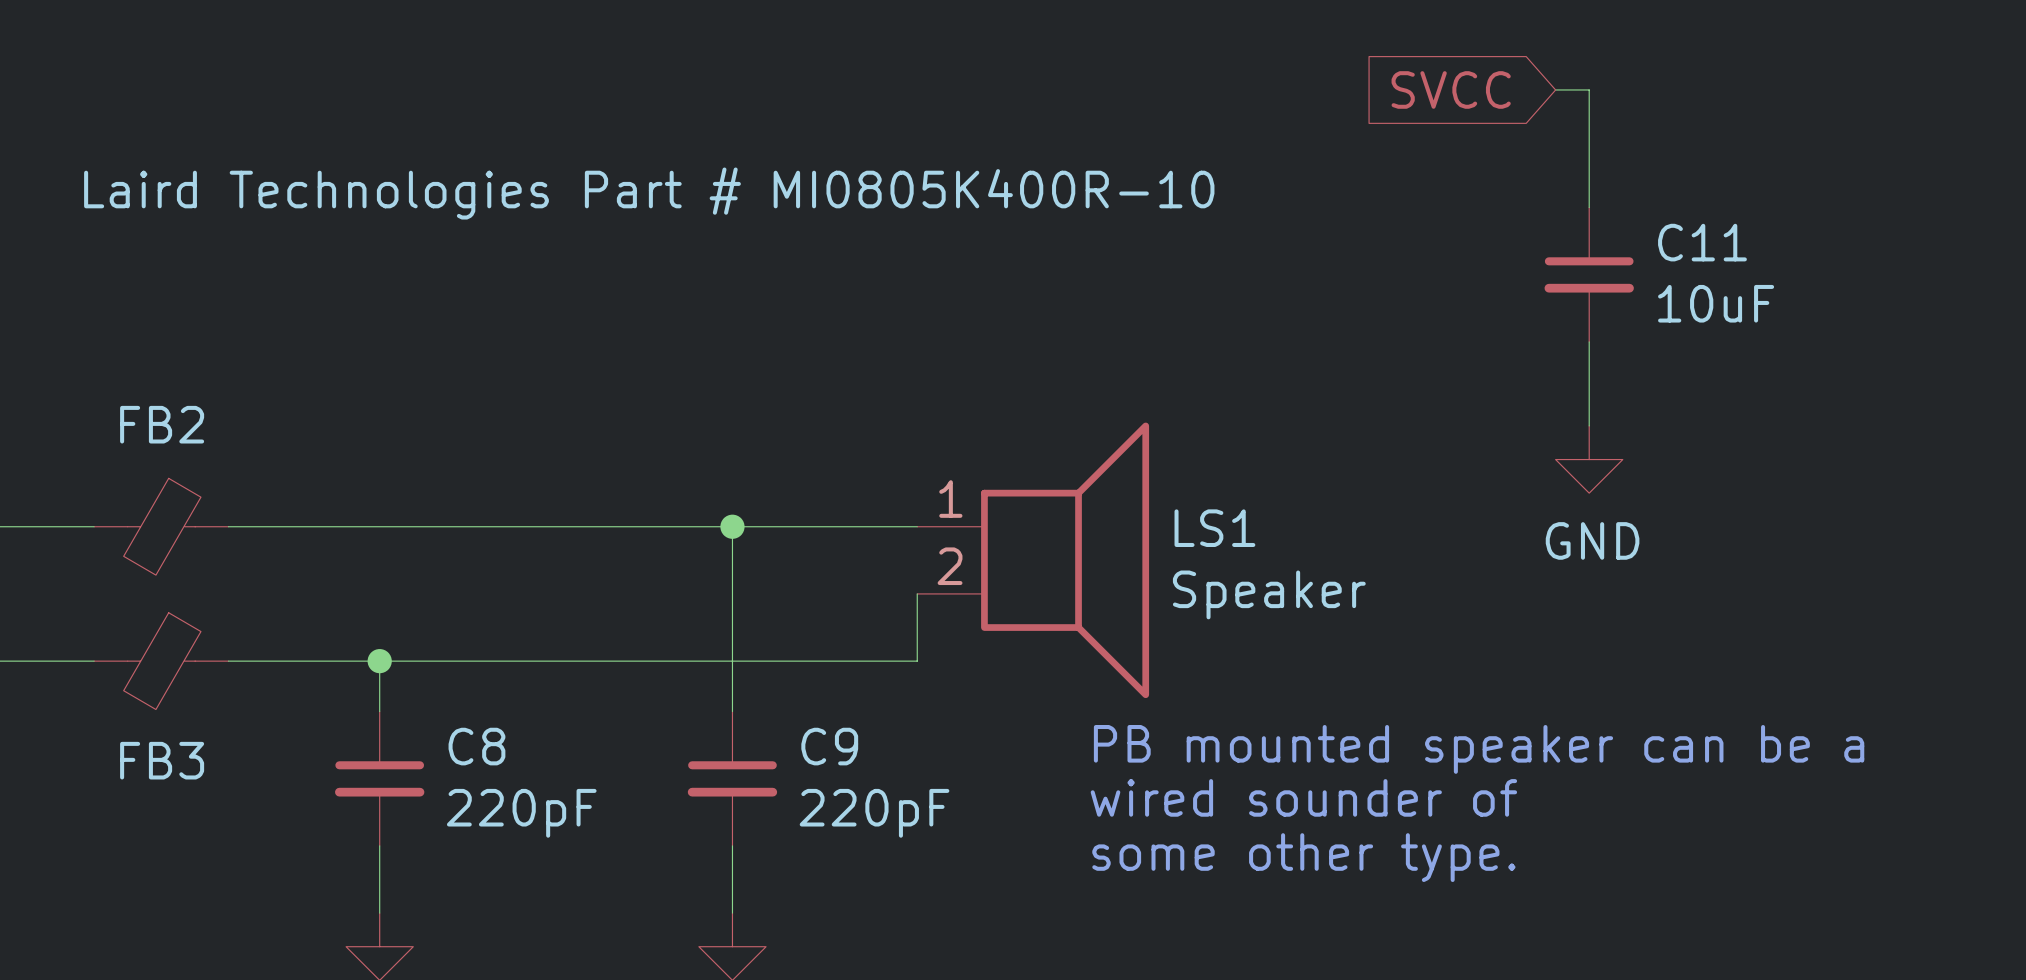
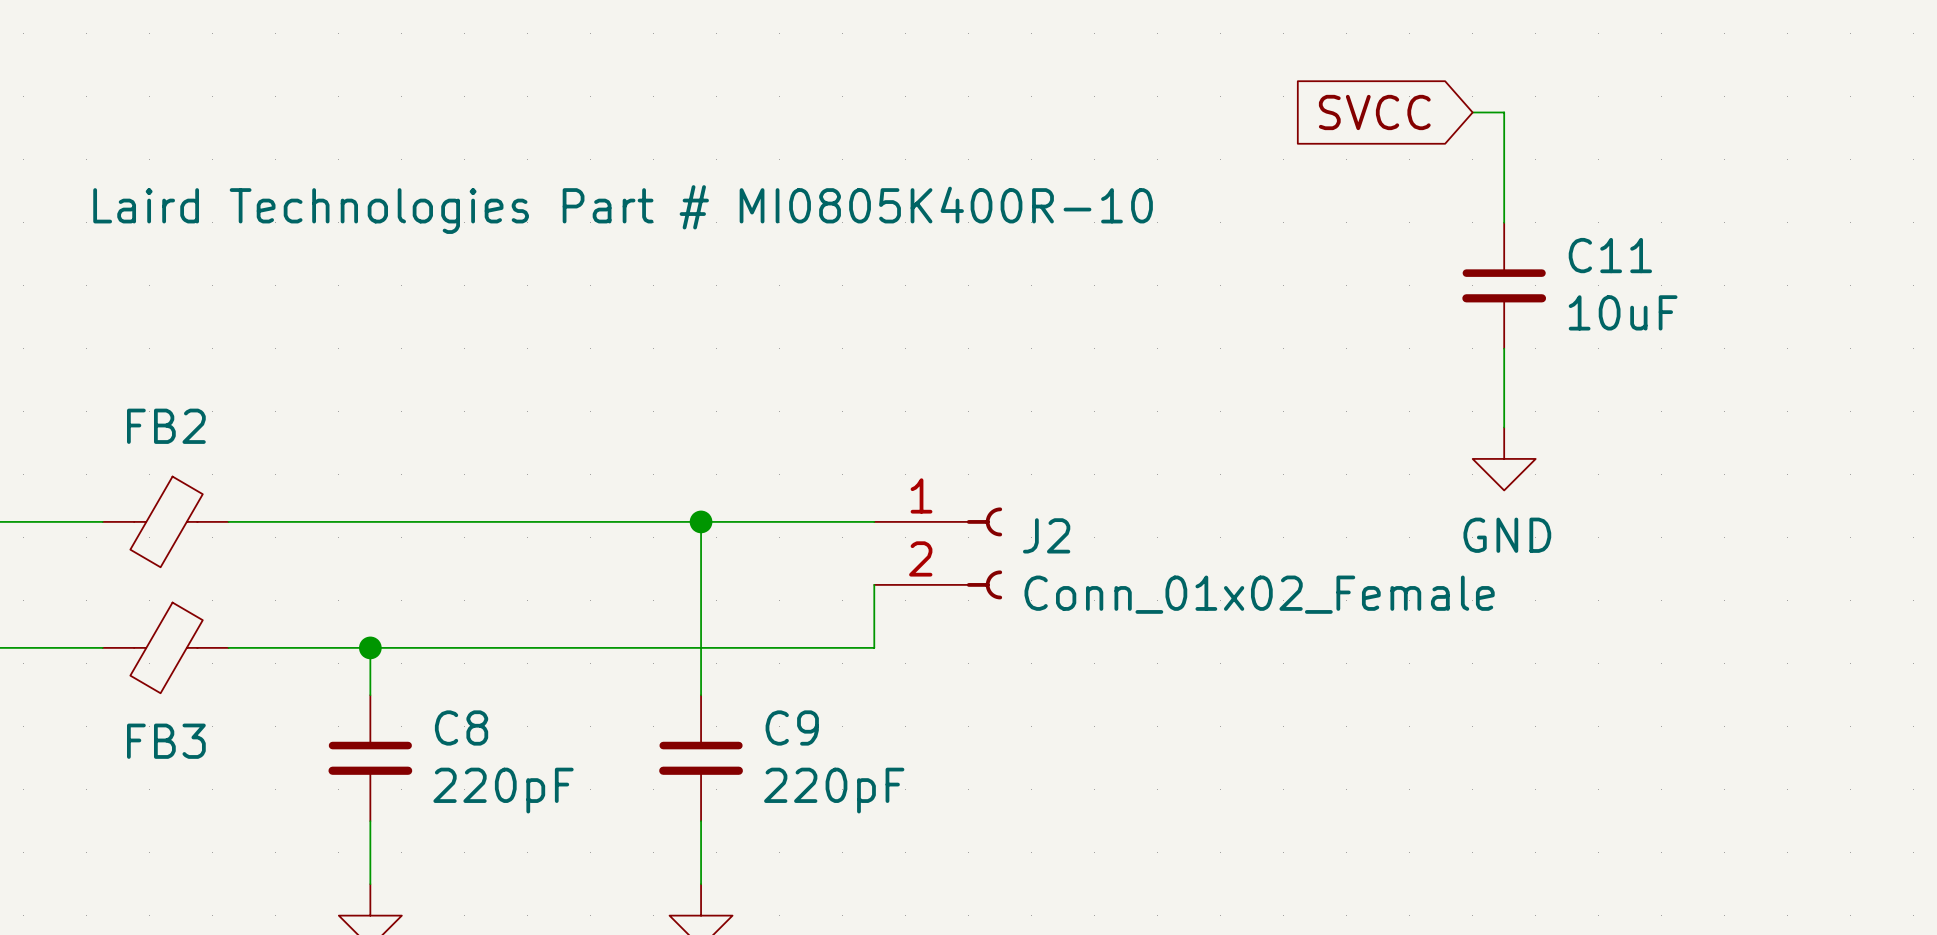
J2: none -> Conn_01x02_Female (938, 553)
LS1: Speaker (1033, 560) -> none
text: PB mounted speaker can be a (1479, 749) -> none
text: wired sounder of (1303, 797) -> none
text: some other type. (1303, 857) -> none

